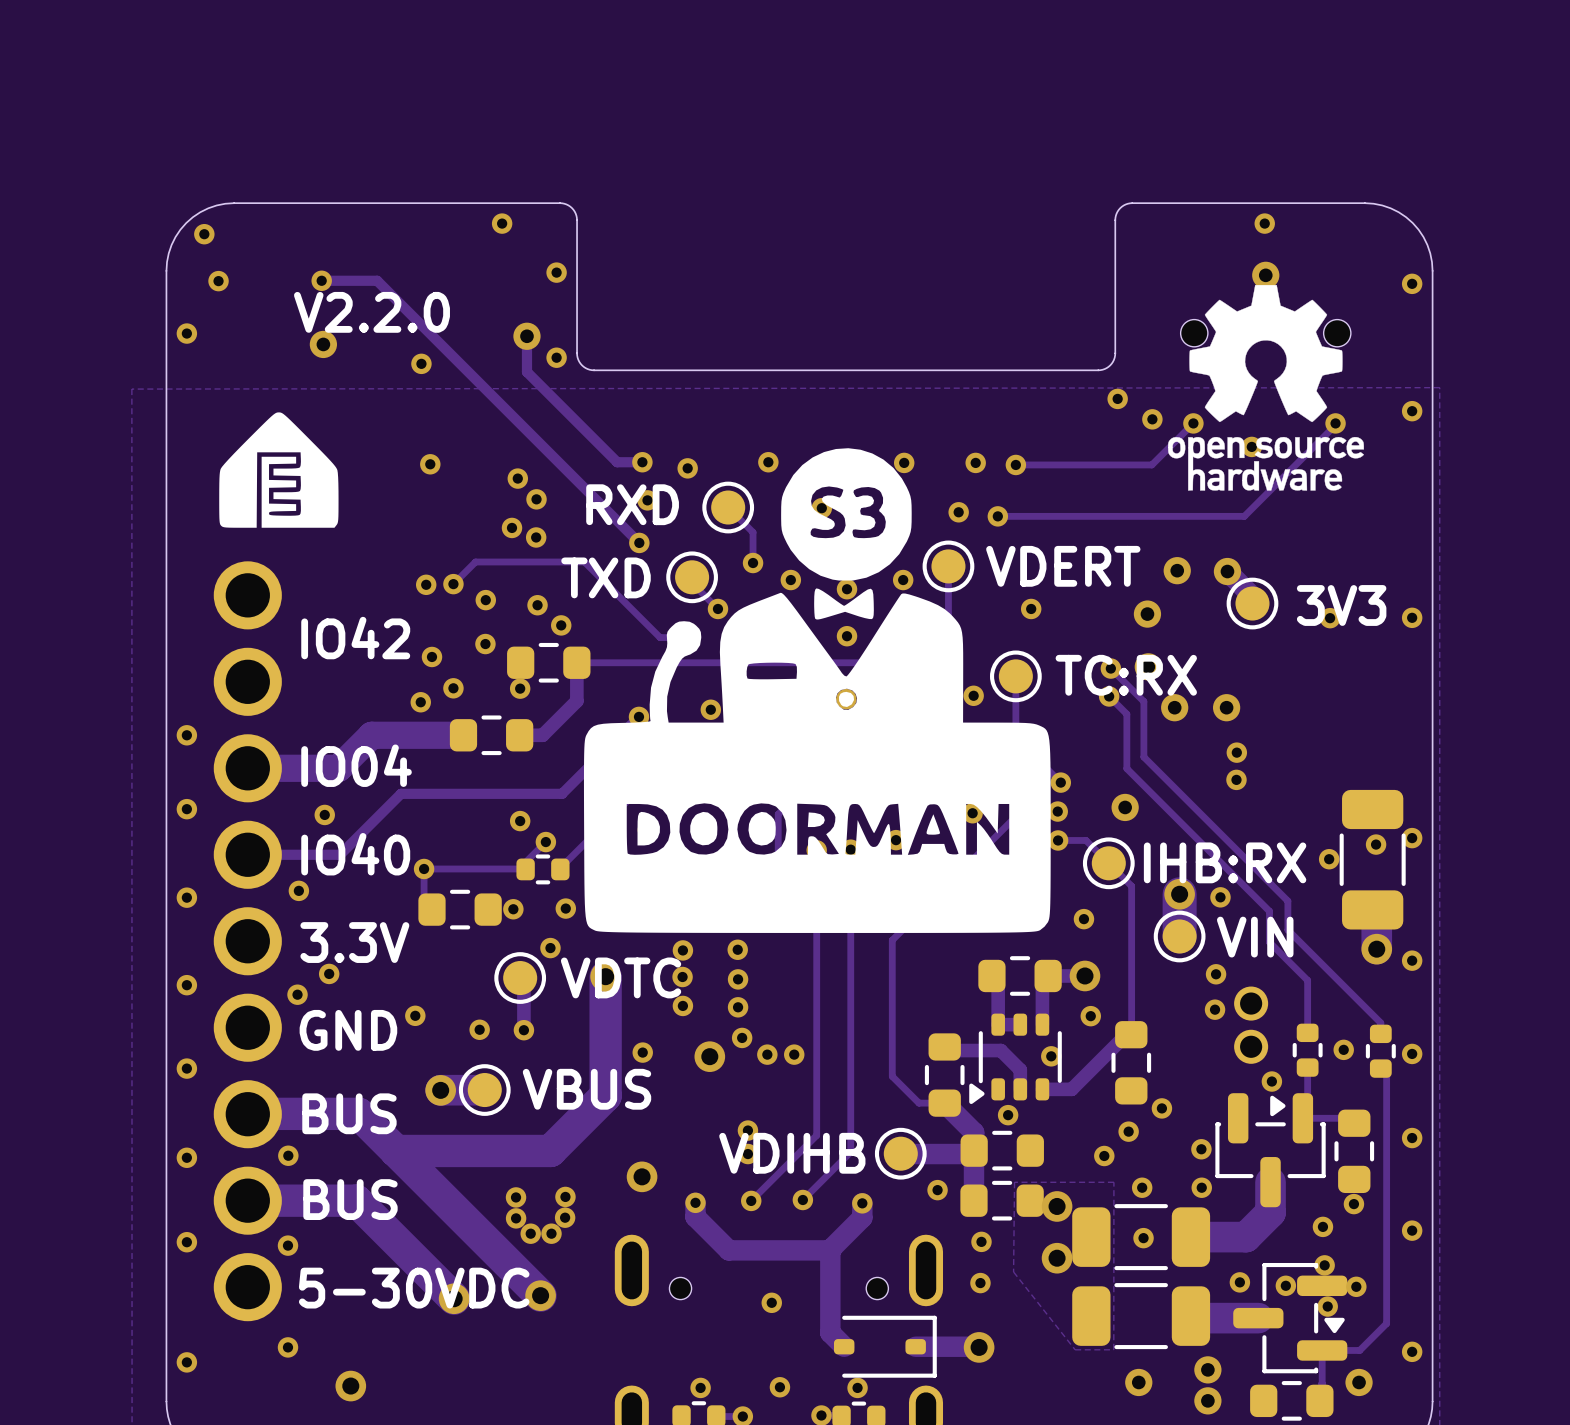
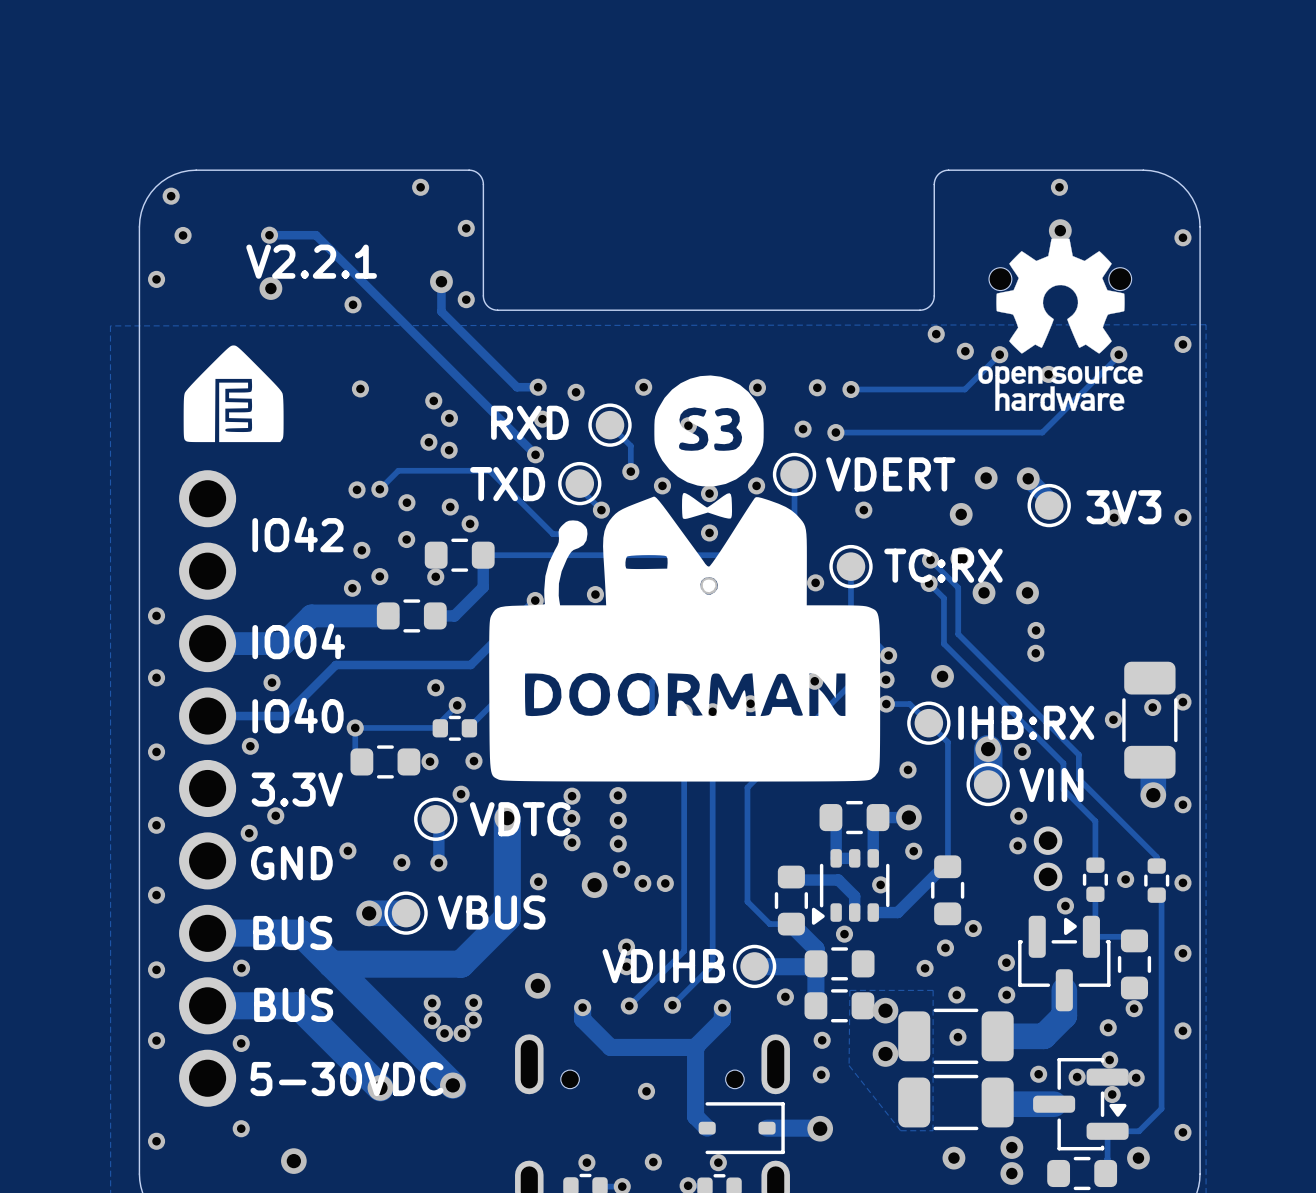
text: V2.2.0 (371, 312) -> V2.2.1 (311, 261)

